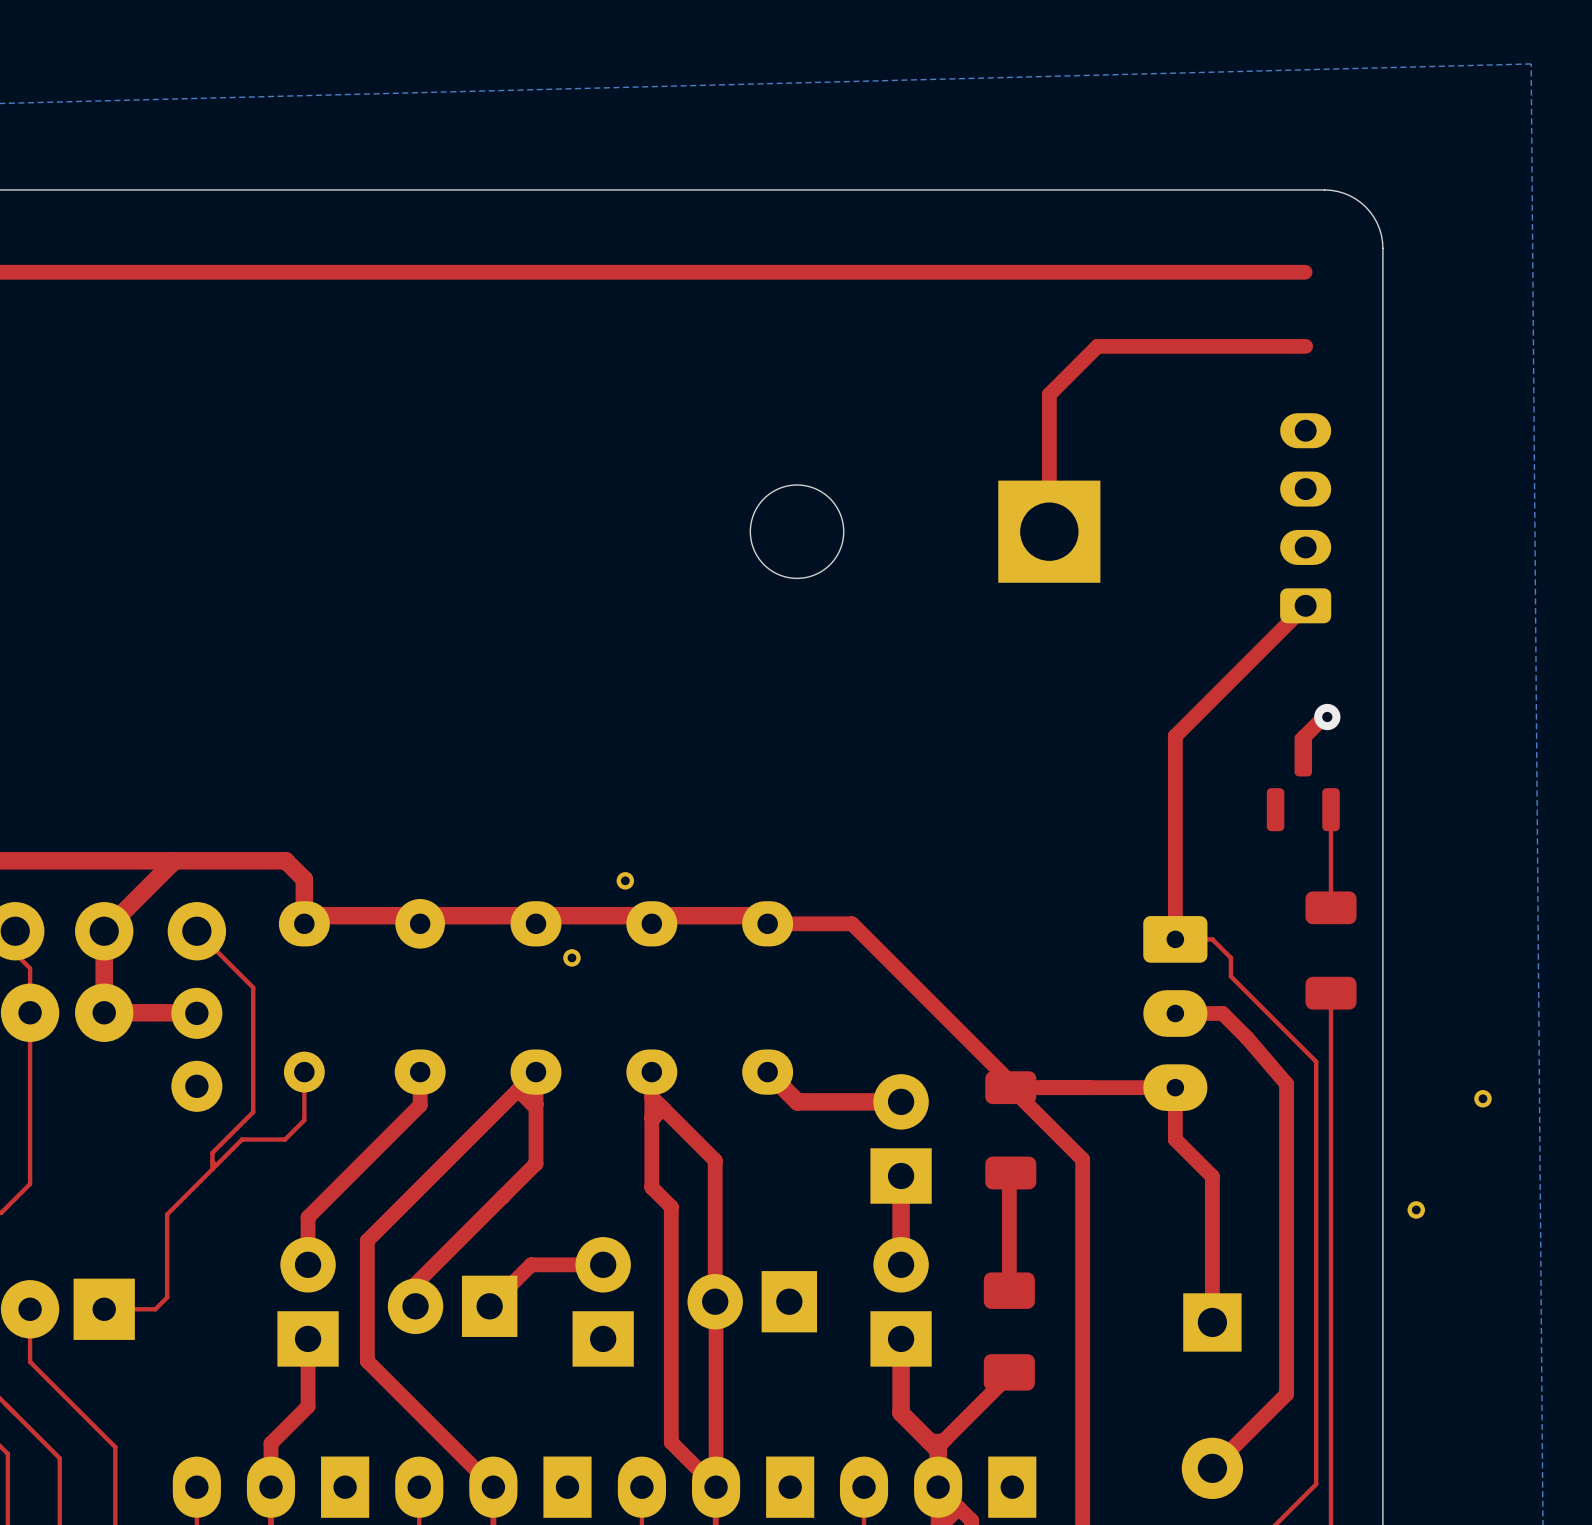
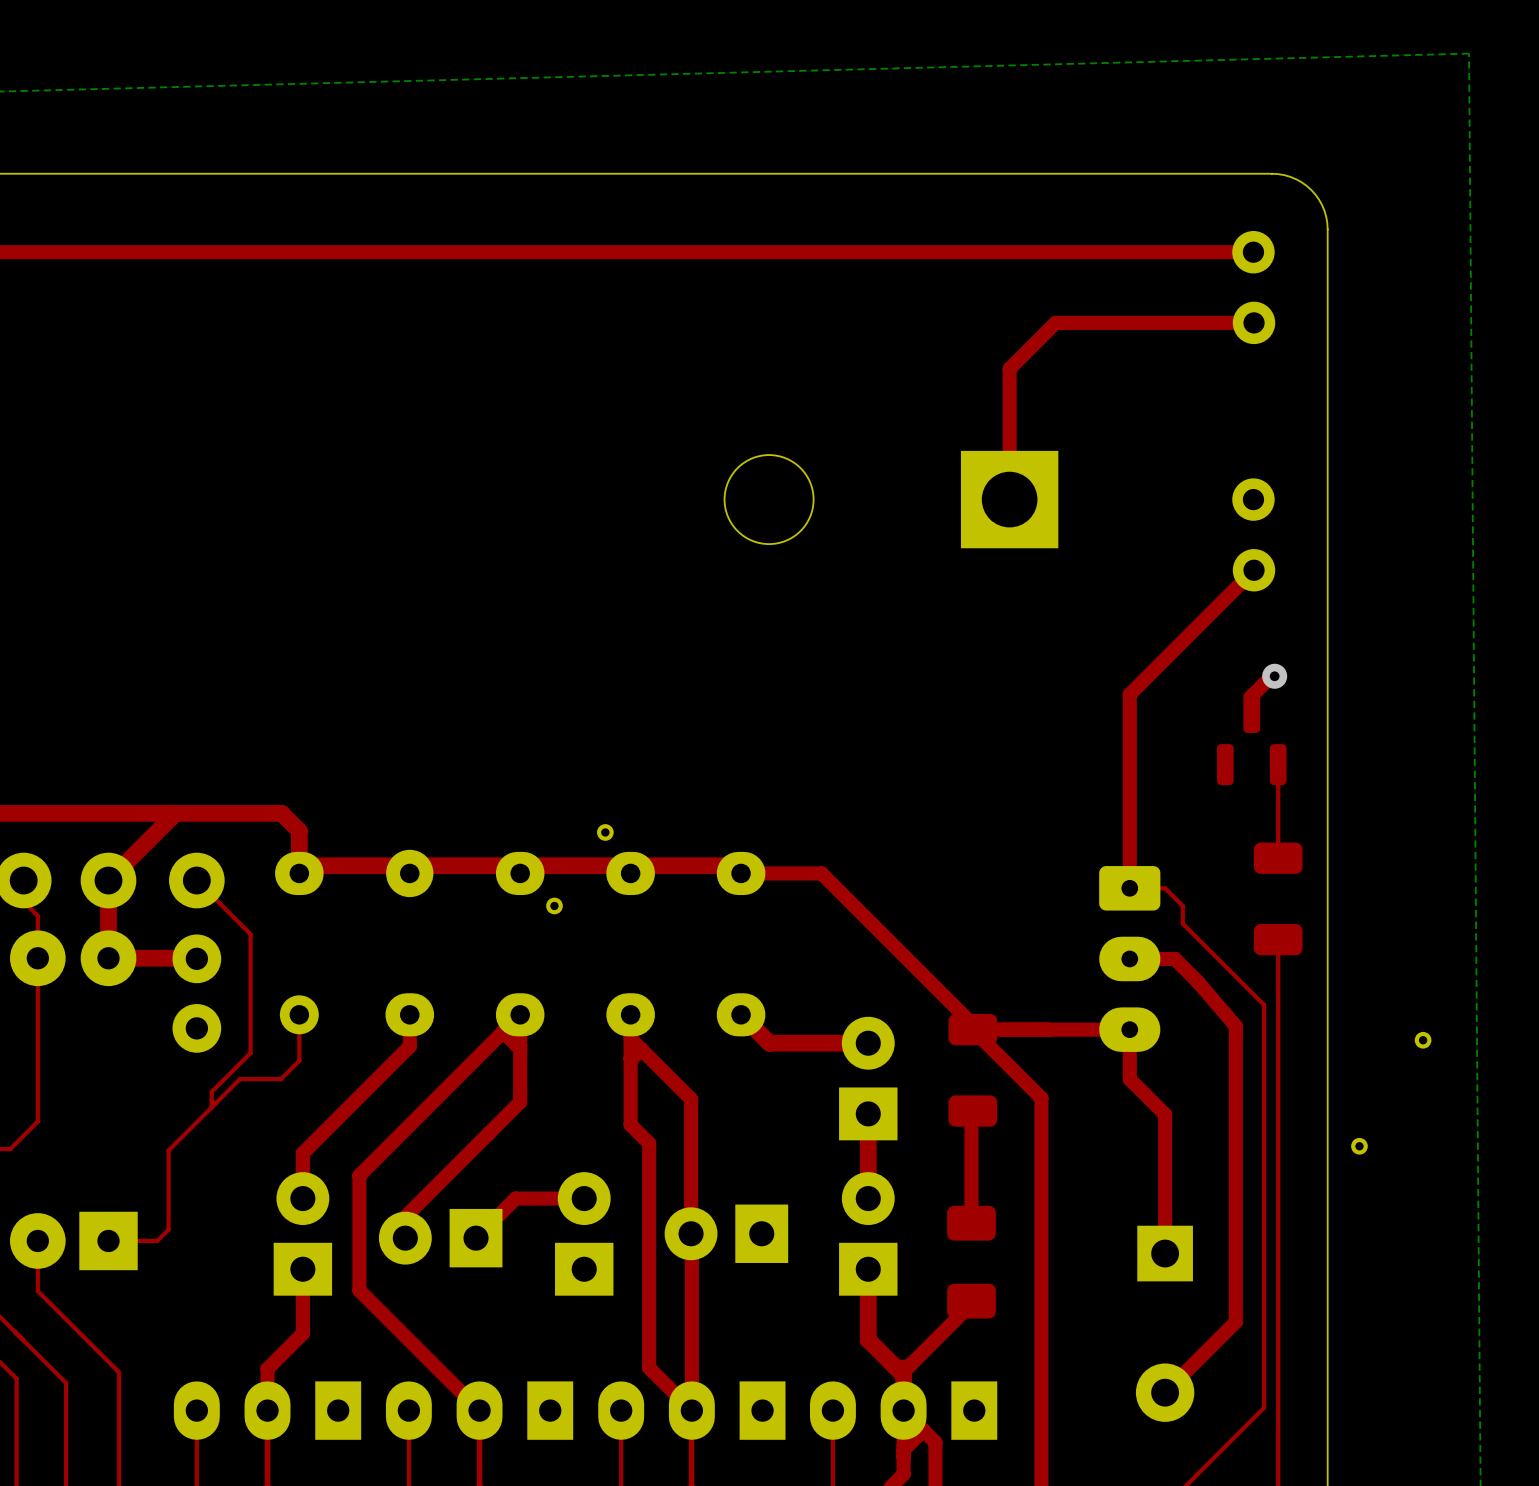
part: none -> (1253, 287)
part: (1305, 518) -> none
part: none -> (1253, 534)

